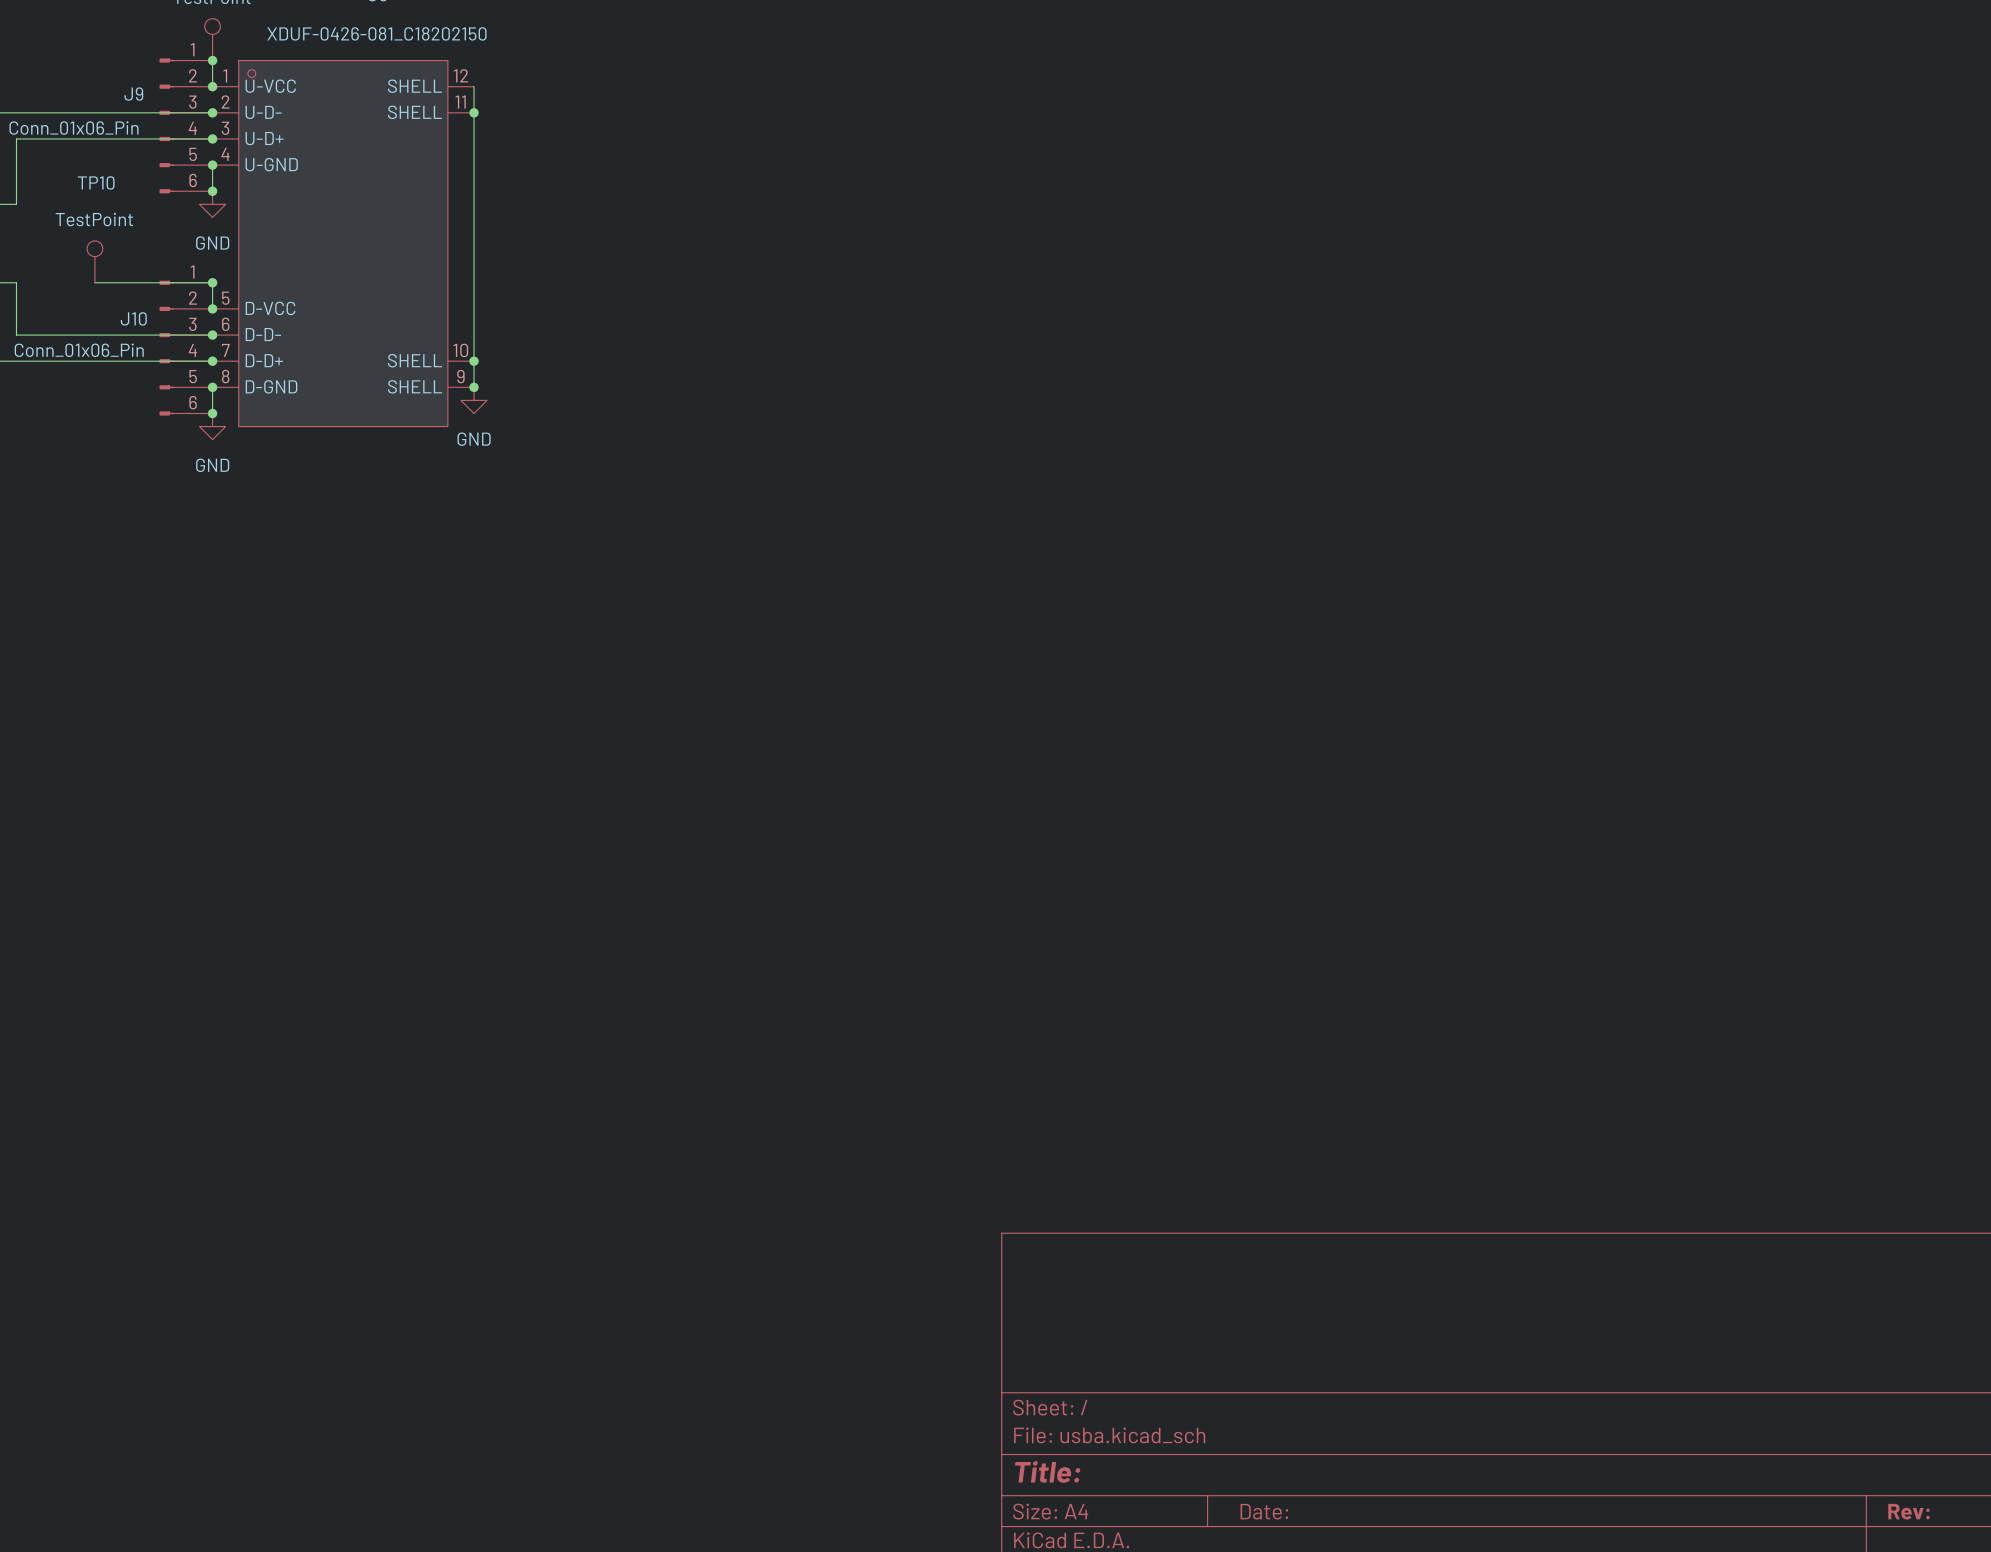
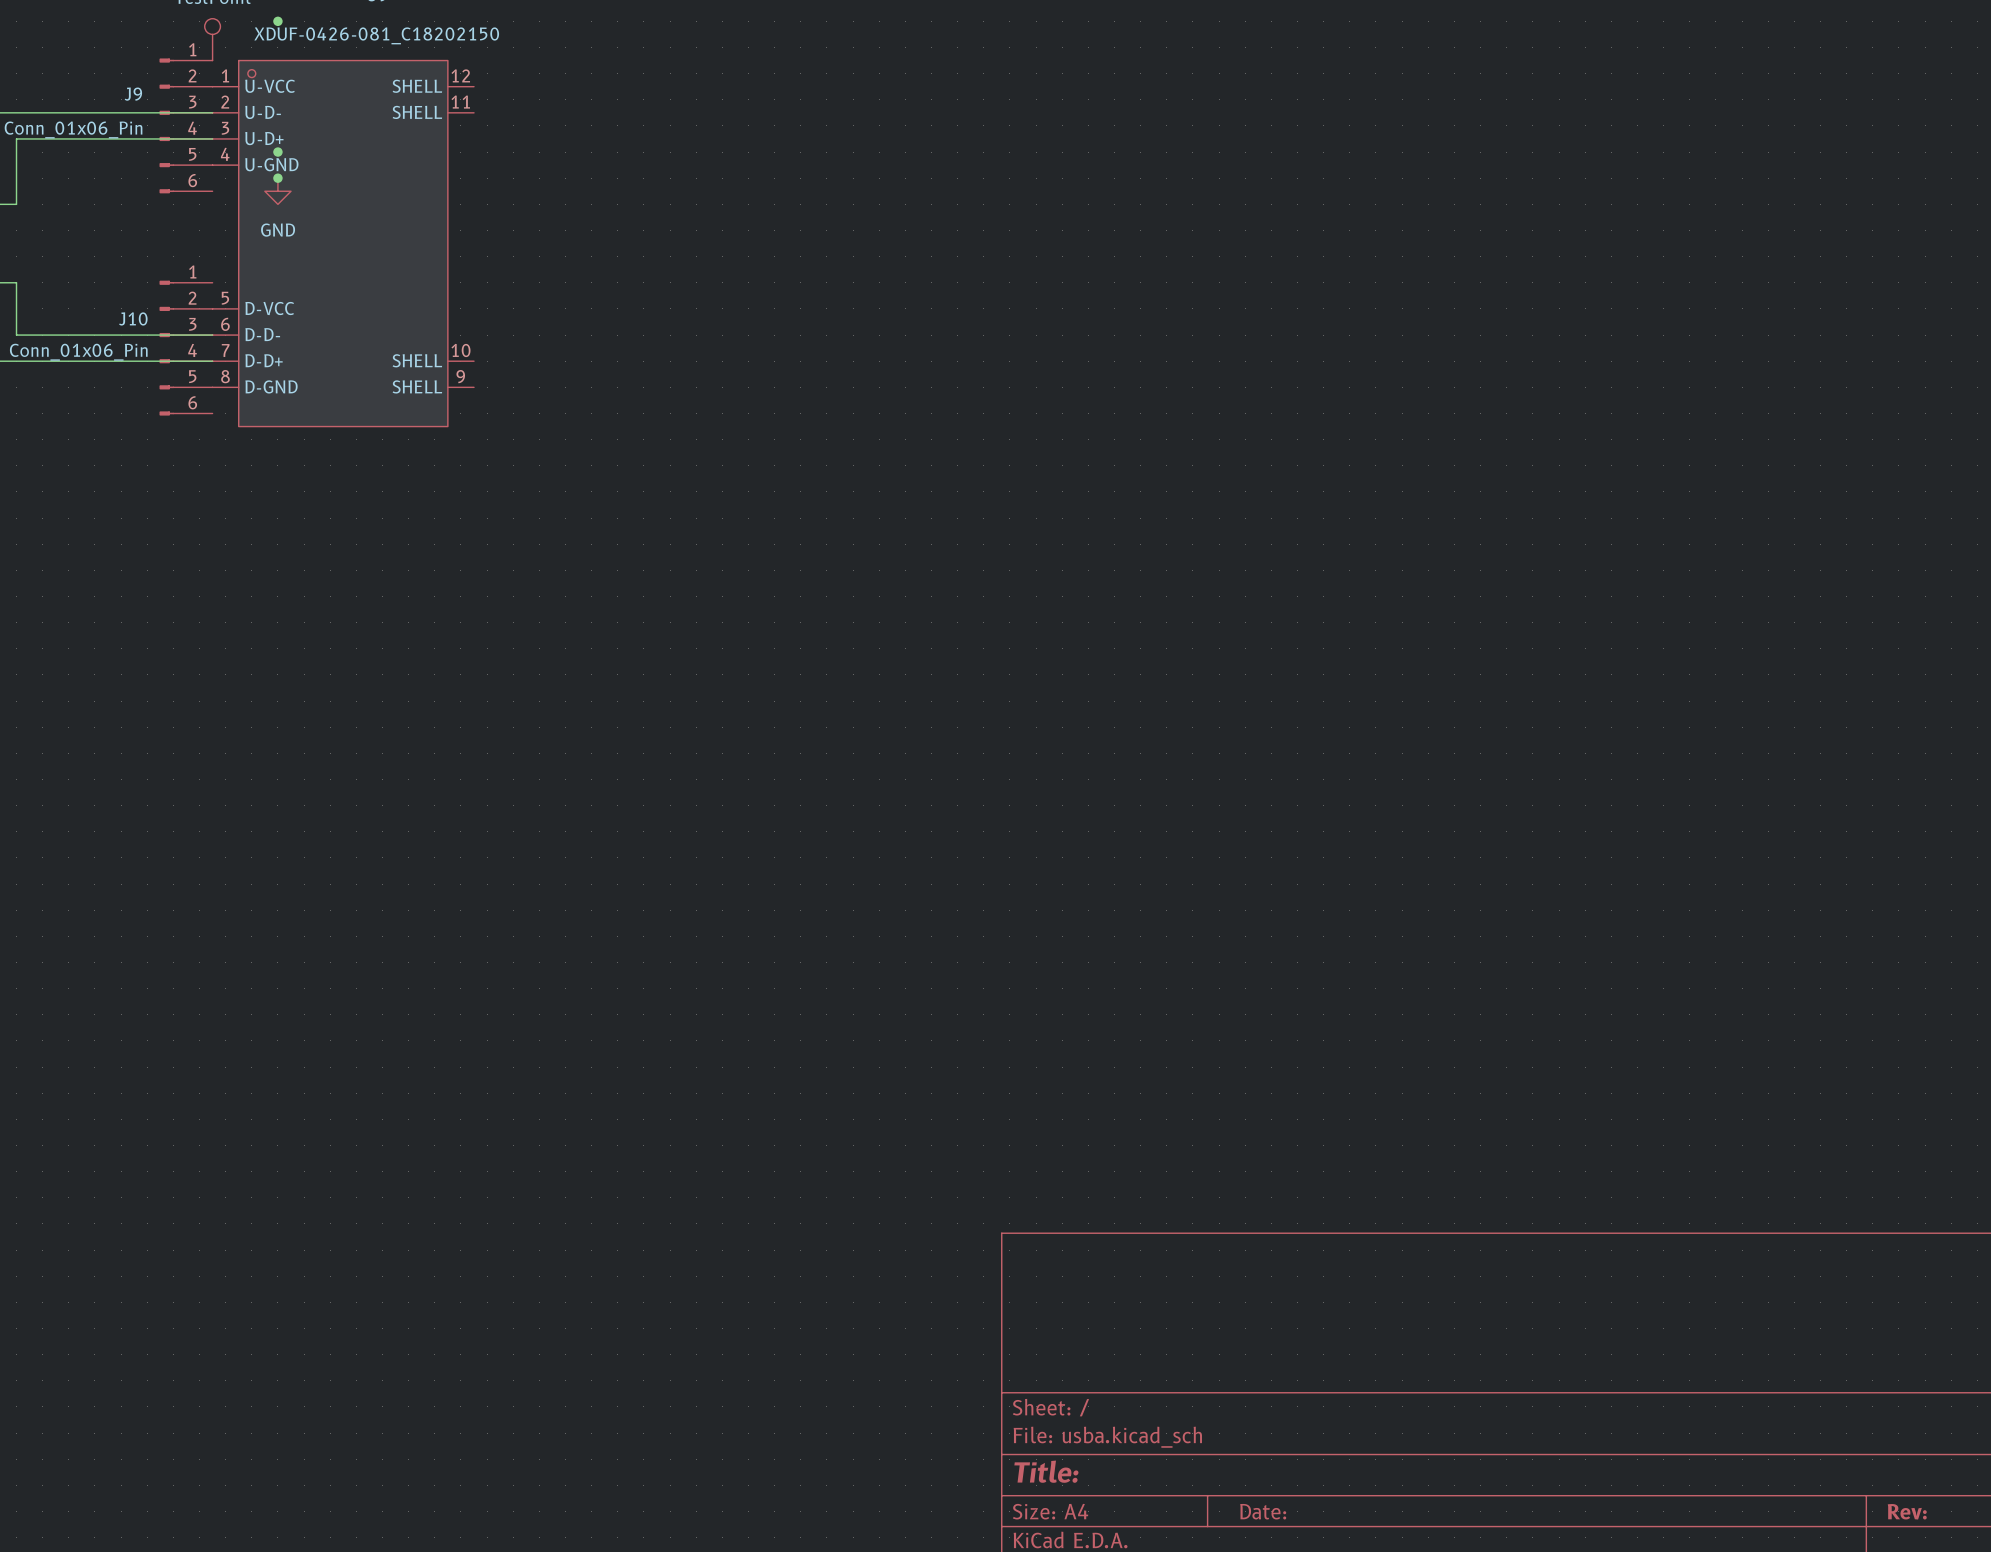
junction: none -> (277, 21)
wire: (212, 60) (212, 86) -> none
junction: (212, 60) -> none
junction: (212, 86) -> none
wire: (474, 86) (474, 387) -> none
junction: (212, 112) -> none
junction: (474, 112) -> none
junction: (212, 138) -> none
junction: none -> (277, 152)
wire: (212, 165) (212, 191) -> none
junction: (212, 165) -> none
junction: none -> (277, 178)
junction: (212, 191) -> none
power symbol position: GND (212, 204) -> GND (277, 191)
TP10: TestPoint (94, 261) -> none
wire: (94, 282) (212, 282) (212, 308) -> none
junction: (212, 282) -> none
junction: (212, 308) -> none
junction: (212, 335) -> none
junction: (212, 361) -> none
junction: (474, 361) -> none
wire: (212, 387) (212, 413) -> none
junction: (212, 387) -> none
junction: (474, 387) -> none
power symbol: GND (474, 400) -> none
junction: (212, 413) -> none
power symbol: GND (212, 426) -> none

